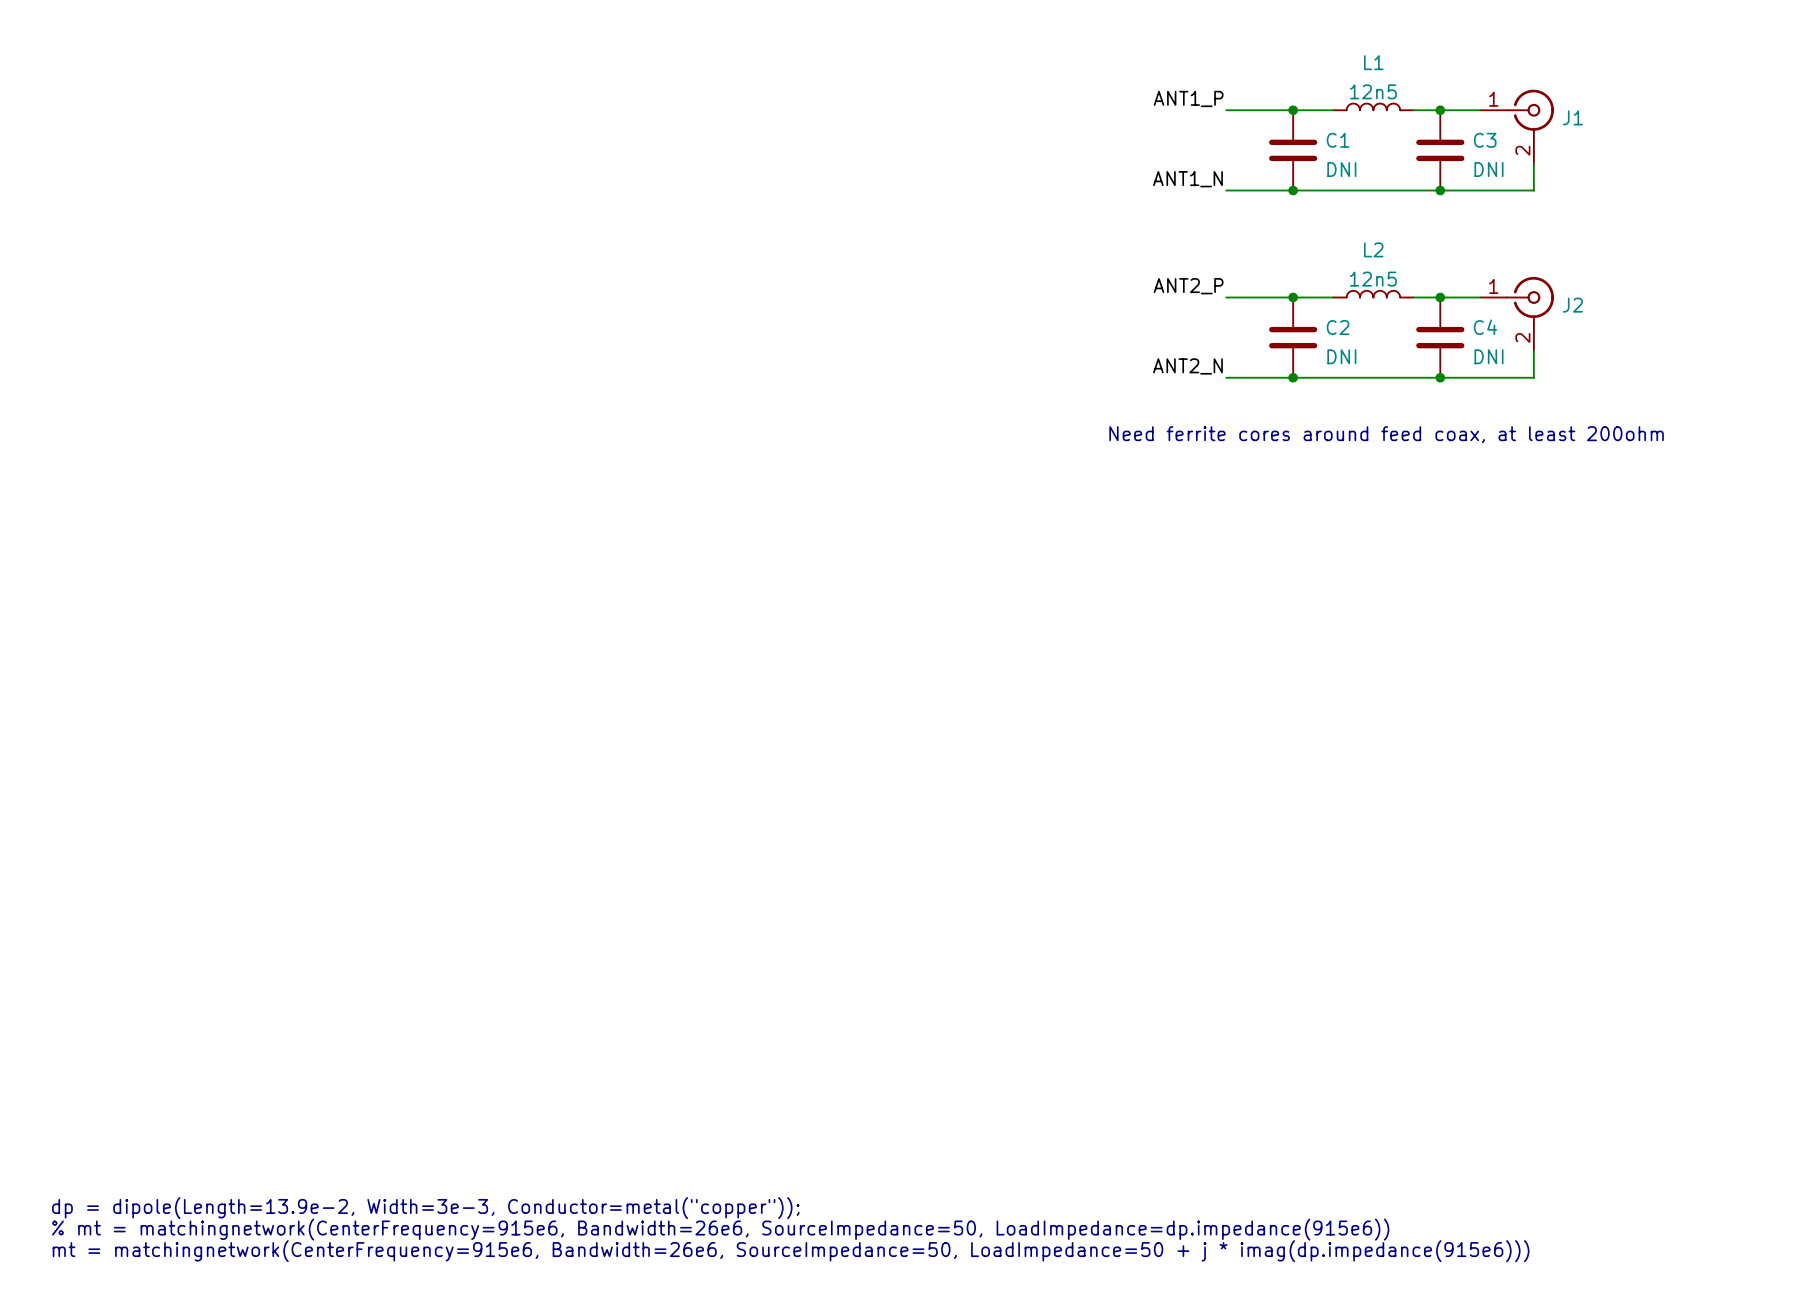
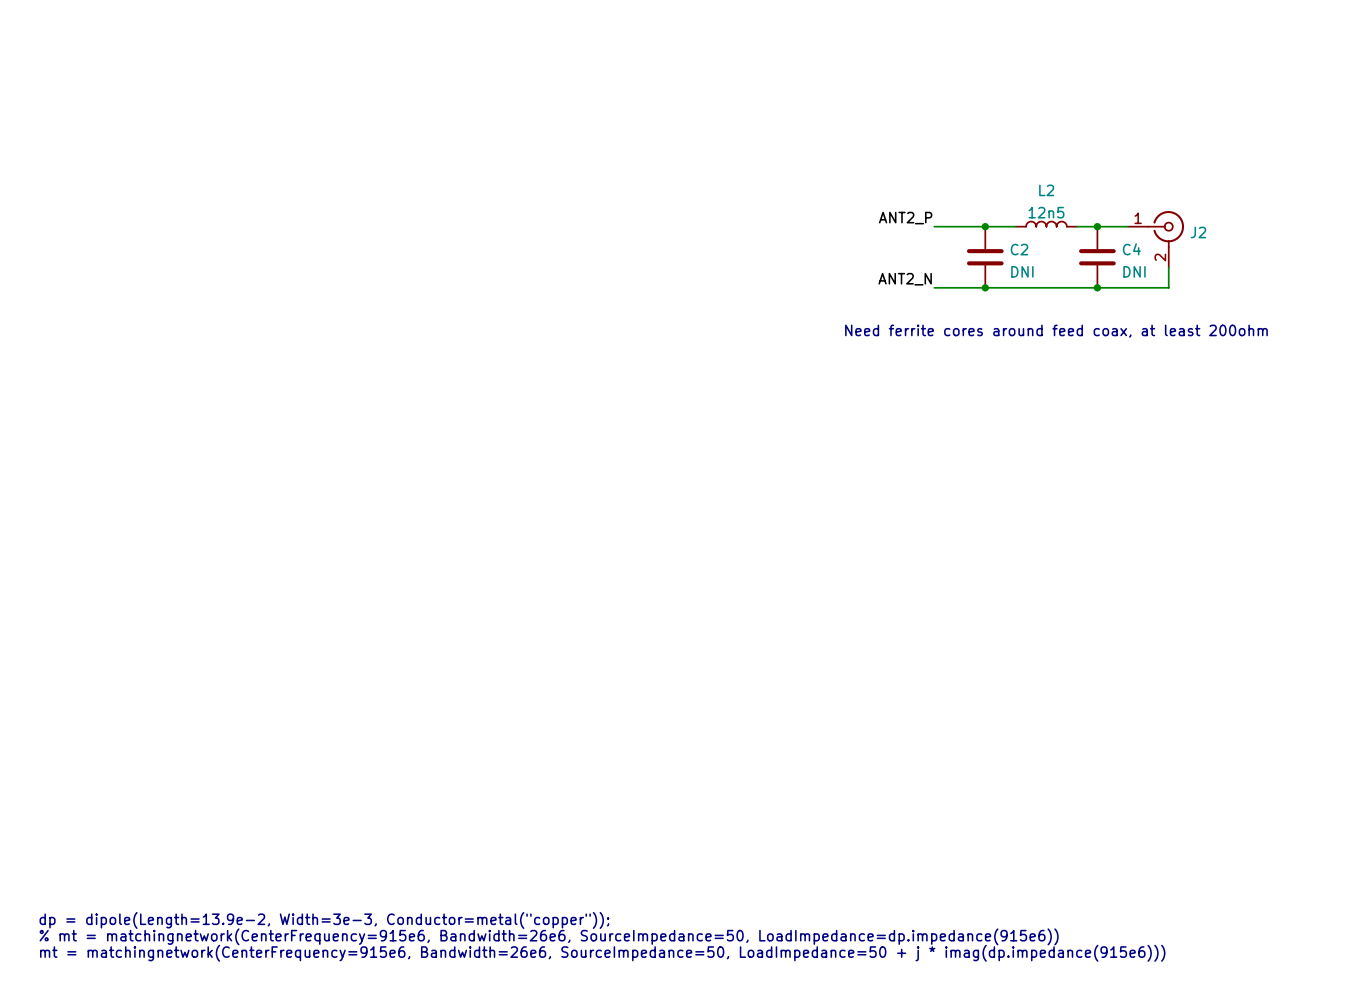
label: ANT1_P (1188, 98) -> none
L1: 12n5 (1373, 106) -> none
wire: (1226, 110) (1333, 110) -> none
junction: (1293, 110) -> none
wire: (1413, 110) (1480, 110) -> none
junction: (1440, 110) -> none
J1: (1517, 126) -> none
C1: DNI (1293, 150) -> none
C3: DNI (1440, 150) -> none
wire: (1533, 163) (1533, 190) (1226, 190) -> none
label: ANT1_N (1187, 179) -> none
junction: (1293, 190) -> none
junction: (1440, 190) -> none

